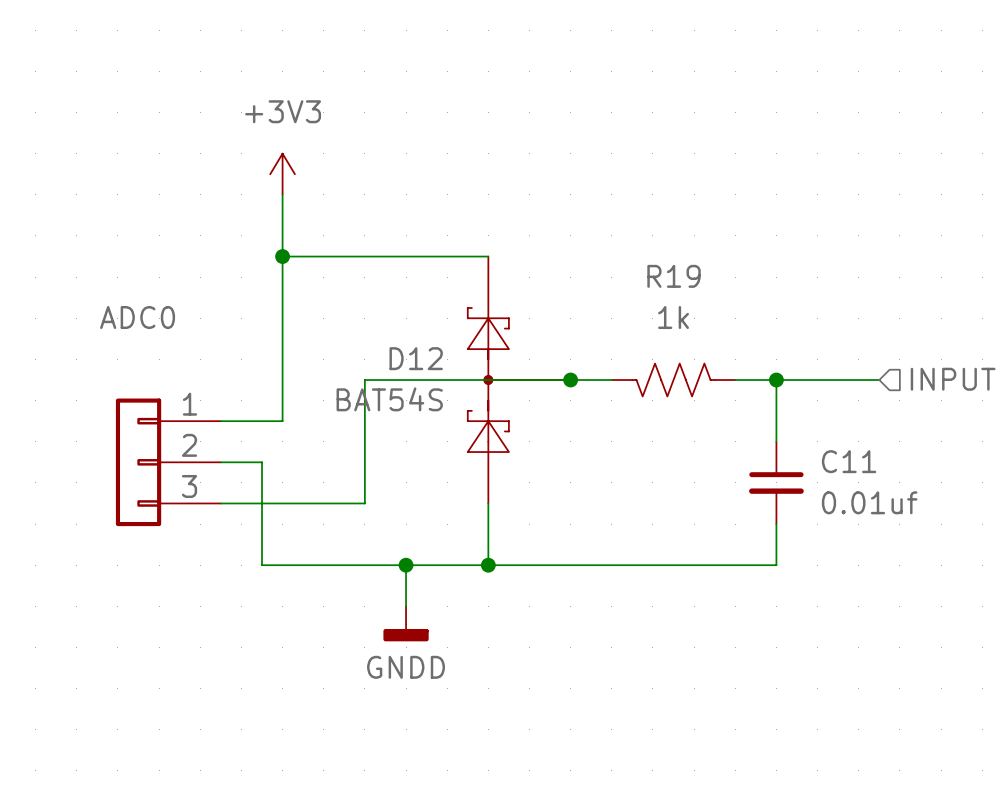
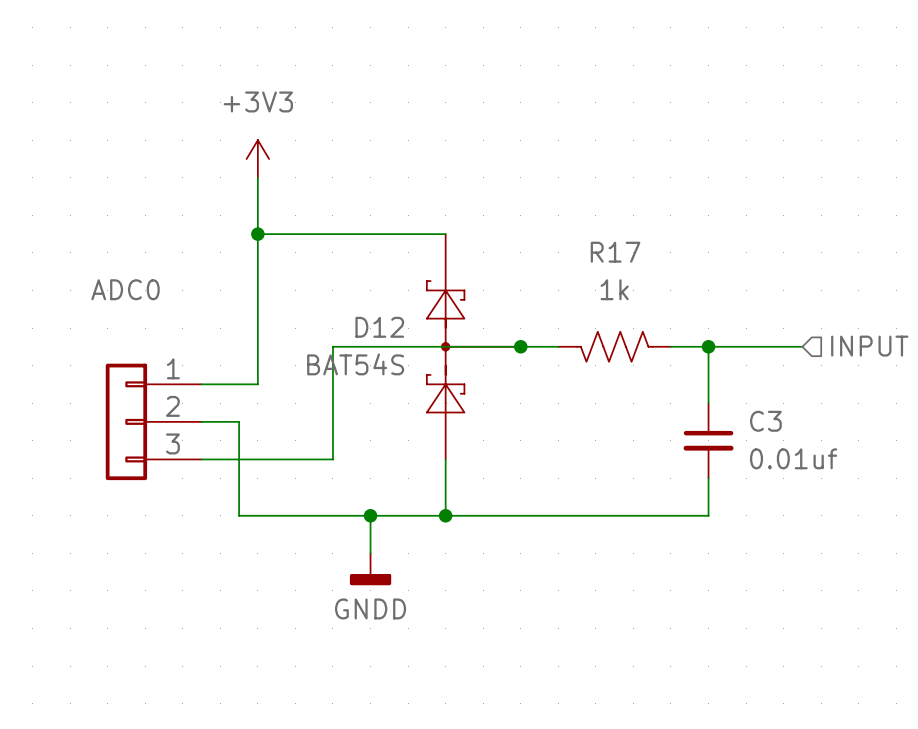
R19 name: R19 (674, 276) -> R17 (615, 252)
C11 name: C11 (849, 461) -> C3 (765, 421)

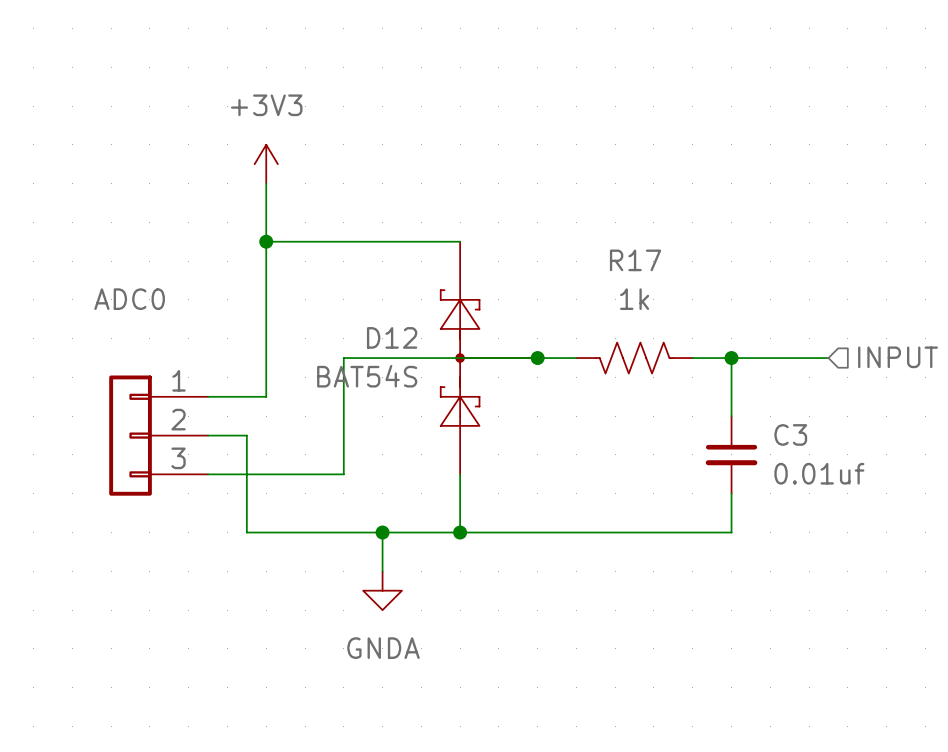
power symbol: GNDD (370, 569) -> GNDA (382, 590)

